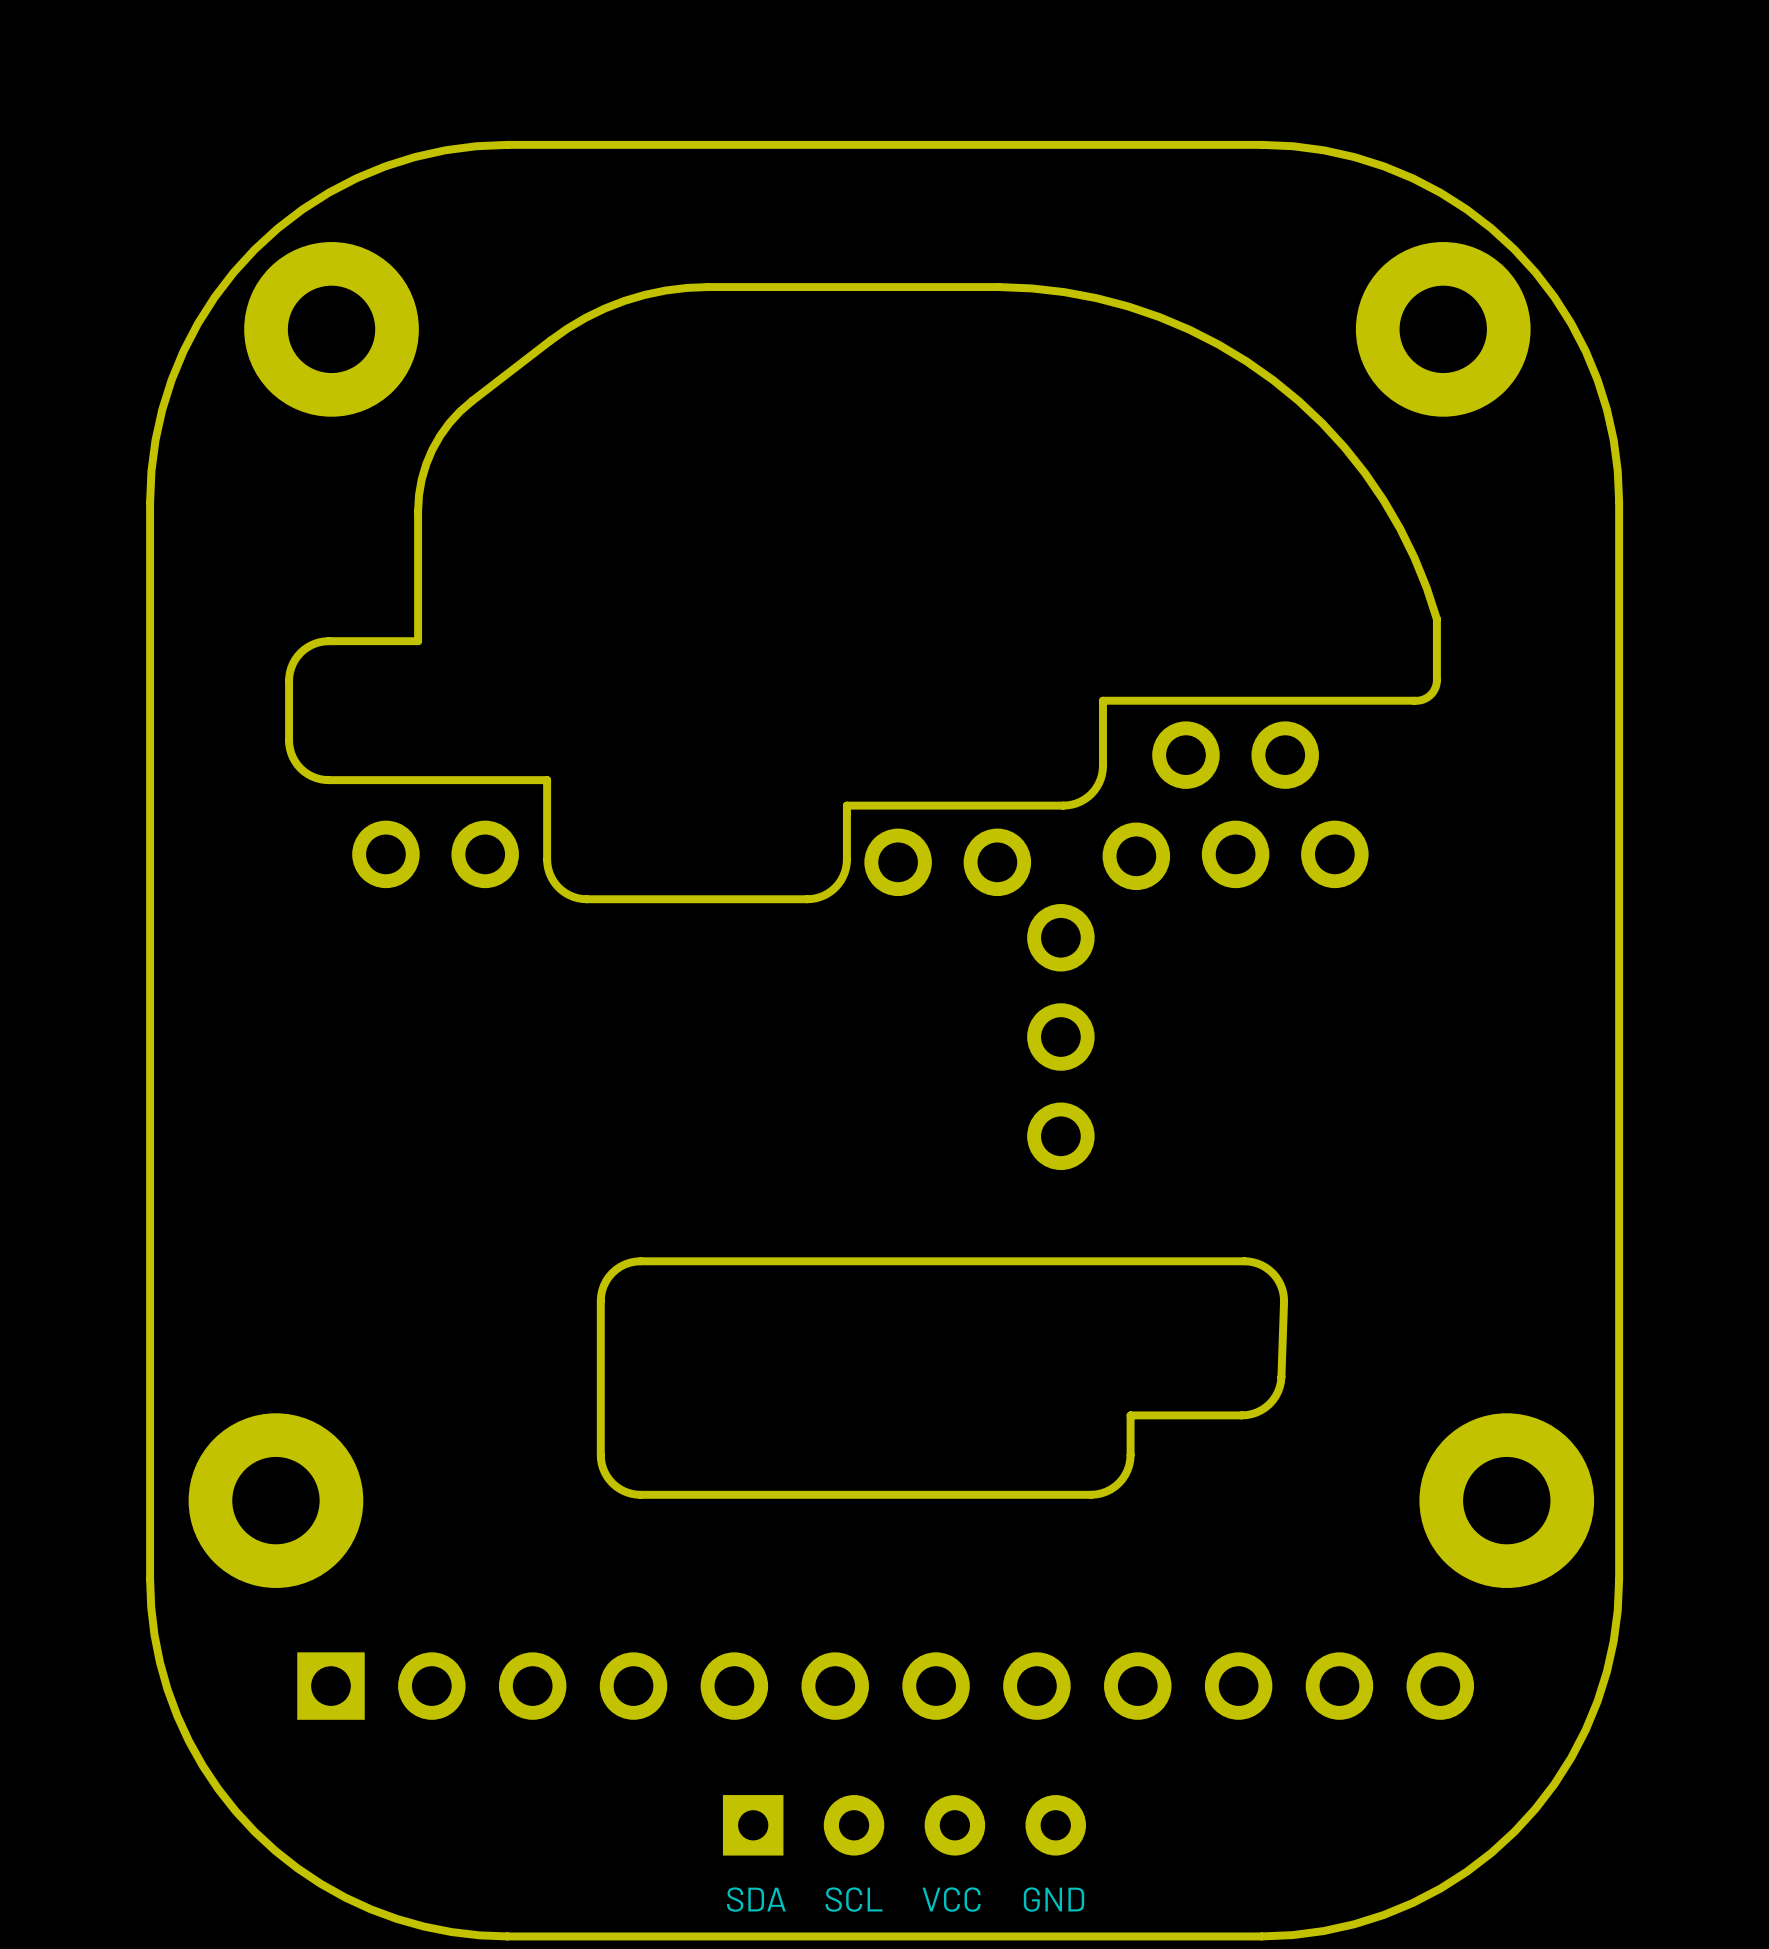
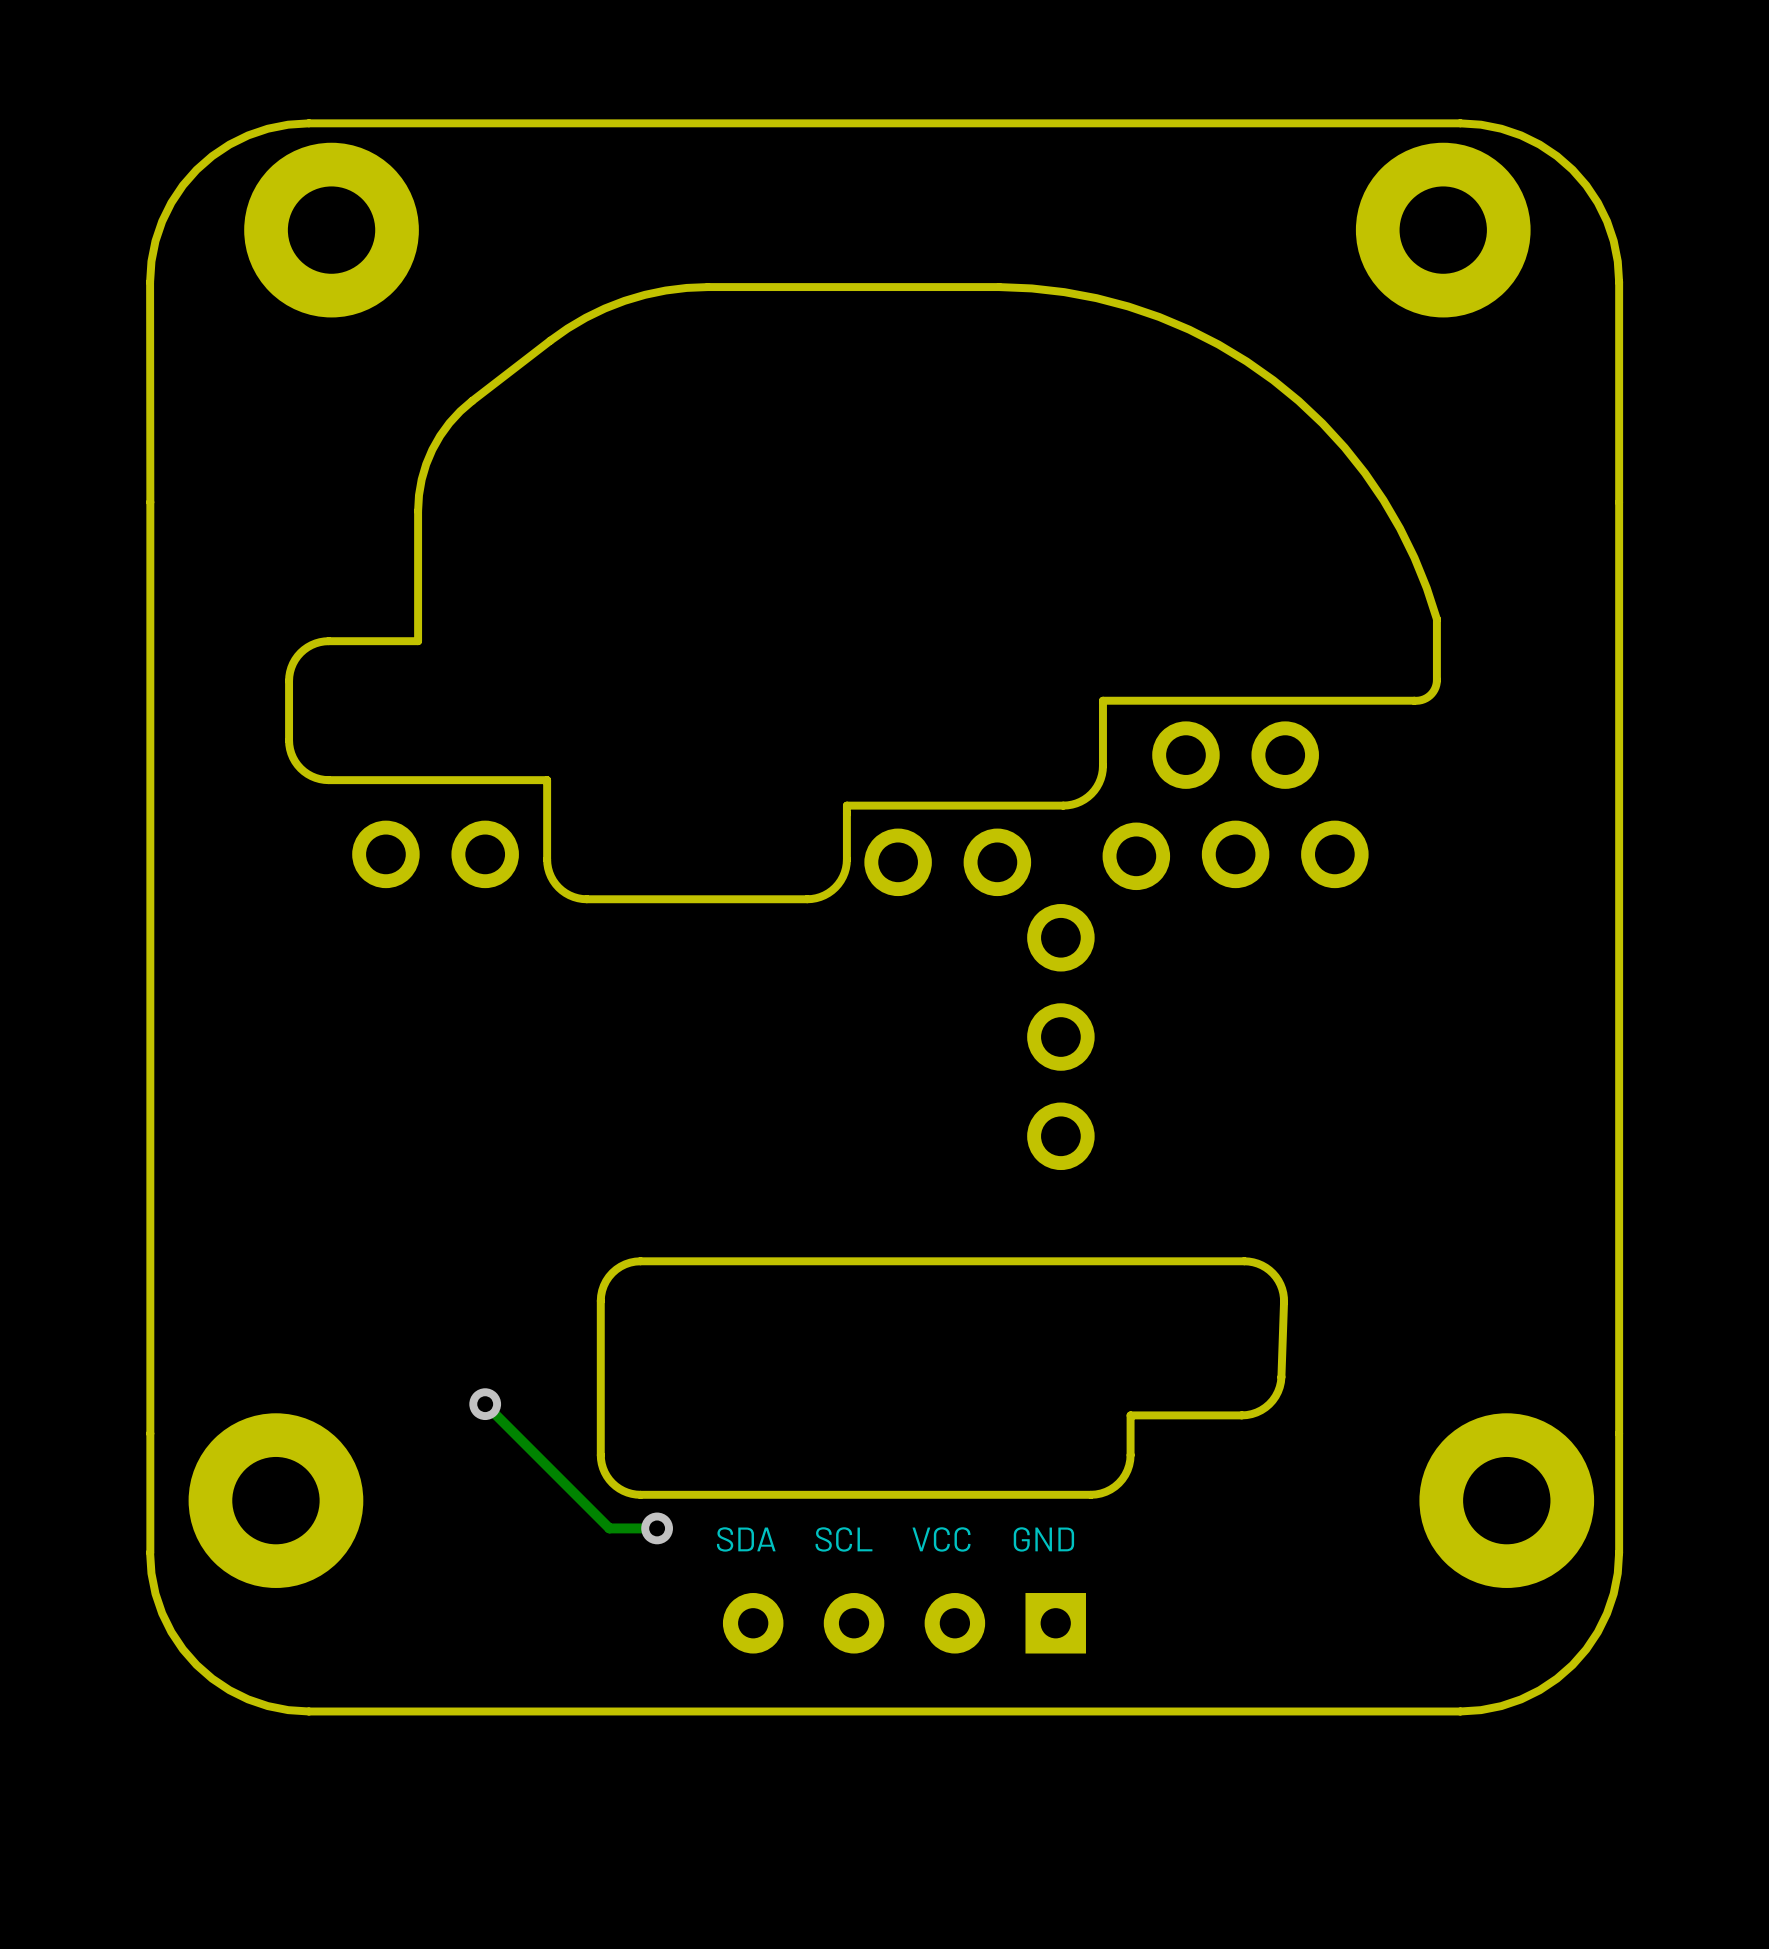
part position: (331, 329) -> (331, 230)
part position: (1443, 329) -> (1443, 230)
part: none -> (884, 917)
part: (884, 1040) -> none
track: none -> (485, 1404) (609, 1528) (657, 1528)
via: none -> (485, 1404)
via: none -> (657, 1528)
text position: SDA (756, 1899) -> SDA (746, 1539)
text position: SCL (854, 1899) -> SCL (843, 1539)
text position: VCC (951, 1899) -> VCC (941, 1539)
text position: GND (1053, 1899) -> GND (1043, 1539)

